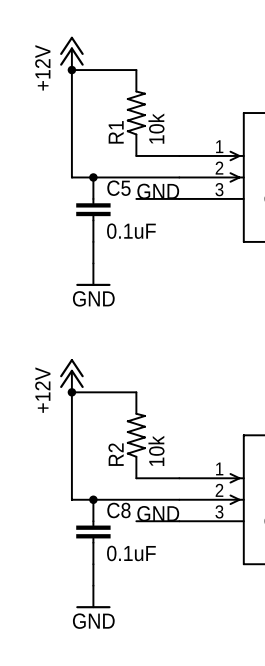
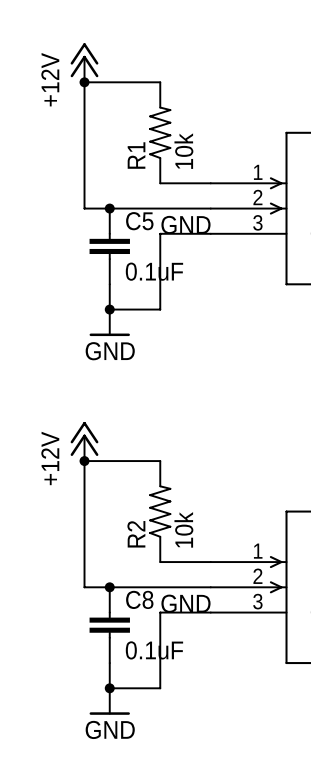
wire: none -> (160, 233) (160, 309) (109, 309)
junction: none -> (109, 309)
wire: none -> (160, 612) (160, 688) (109, 688)
junction: none -> (109, 688)

